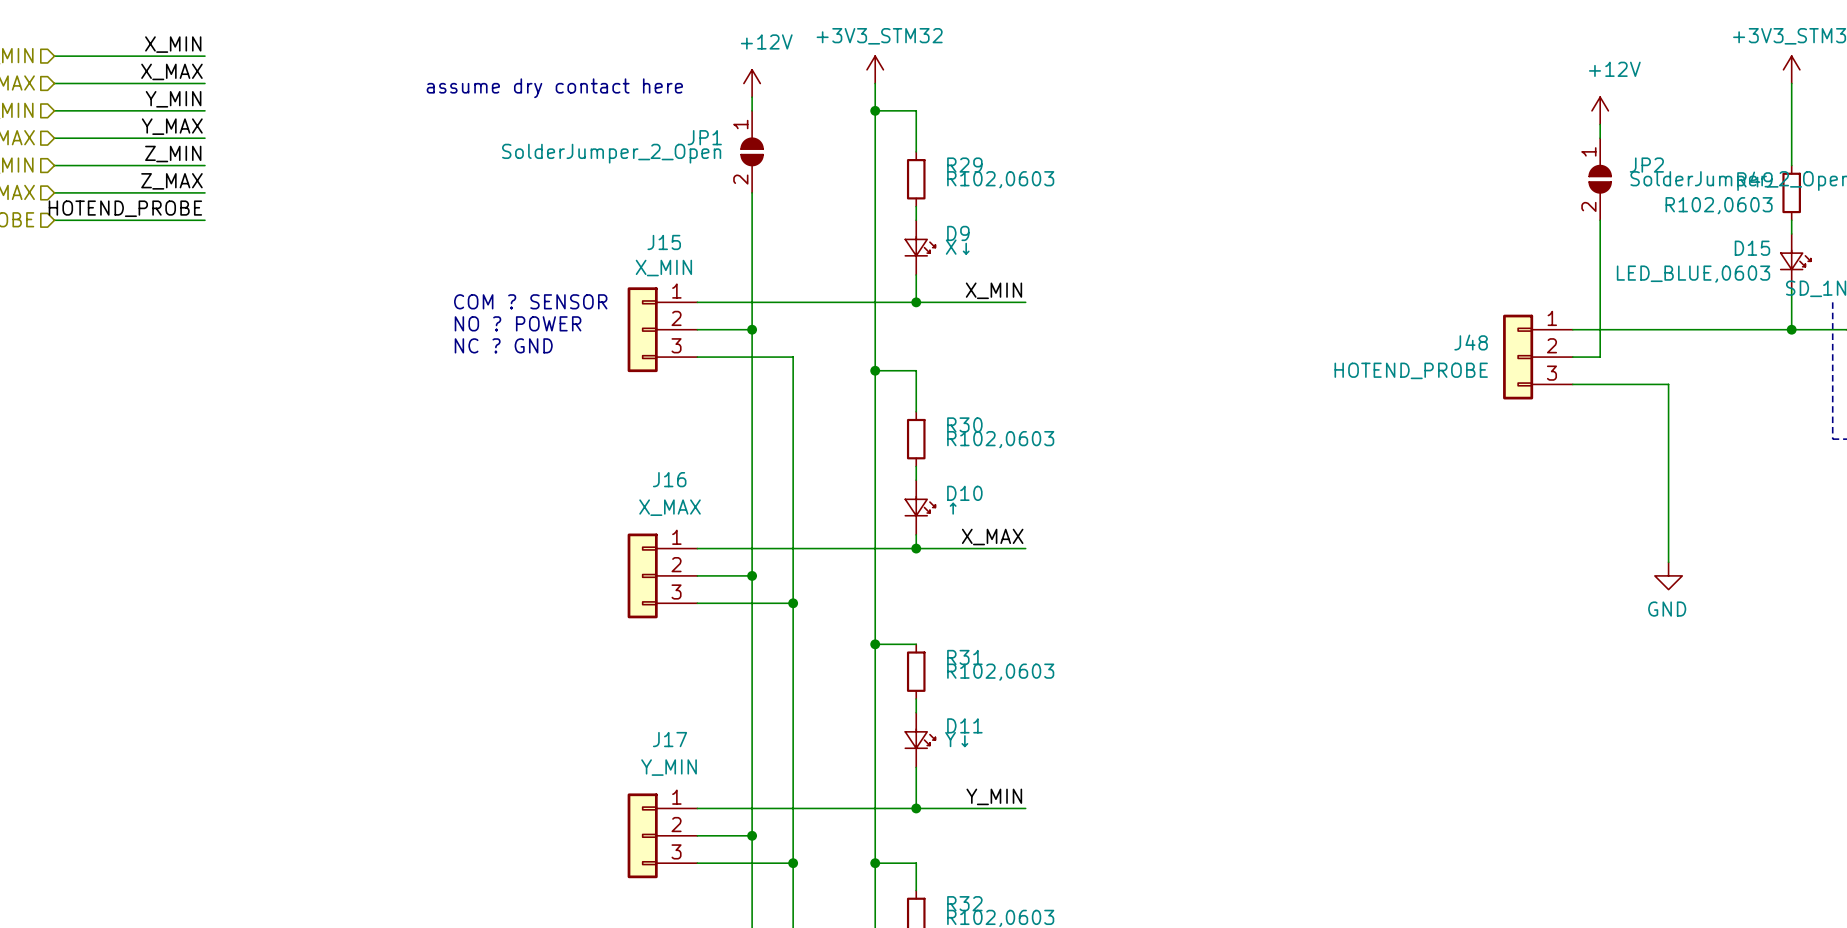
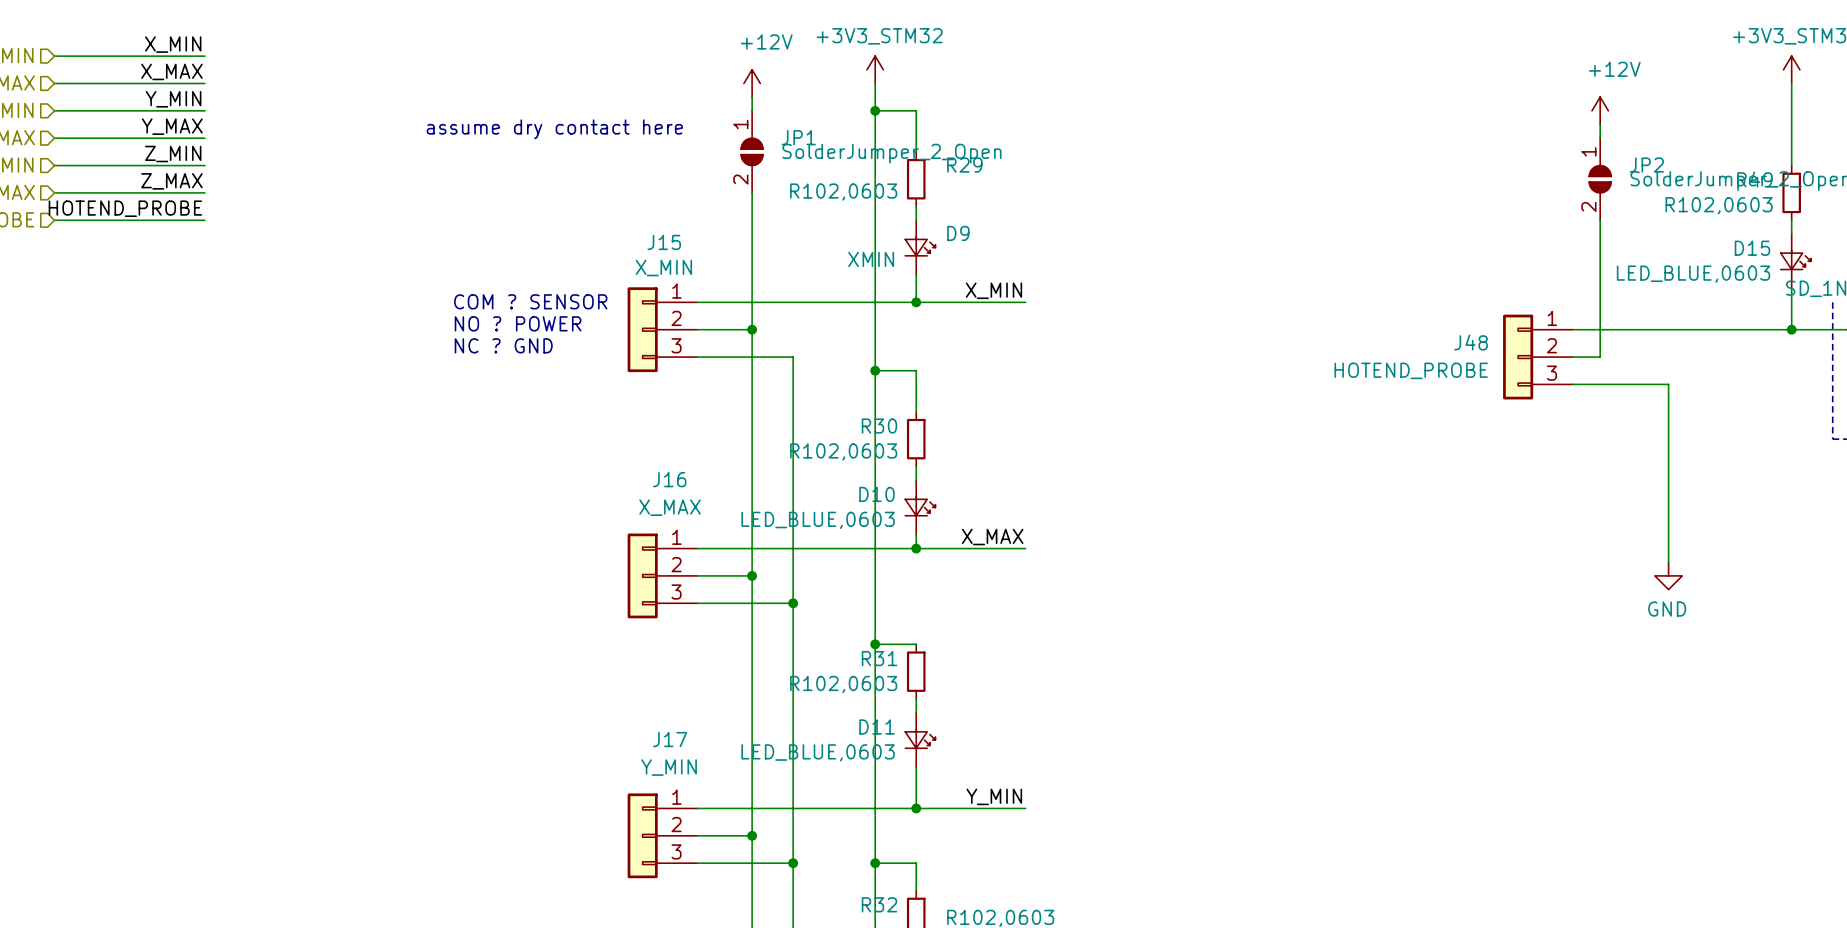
text position: assume dry contact here (554, 88) -> assume dry contact here (554, 129)
JP1 name position: JP1 (704, 137) -> JP1 (798, 137)
JP1 value position: SolderJumper_2_Open (611, 153) -> SolderJumper_2_Open (891, 153)
R29 value position: R102,0603 (1000, 179) -> R102,0603 (843, 192)
D9 value: X↓ (957, 247) -> XMIN (871, 259)
R30 name position: R30 (964, 424) -> R30 (879, 426)
R30 value position: R102,0603 (1000, 439) -> R102,0603 (843, 451)
D10 name position: D10 (964, 493) -> D10 (877, 494)
D10 value: ↑ (953, 508) -> LED_BLUE,0603 (818, 520)
R31 name position: R31 (964, 657) -> R31 (879, 658)
R31 value position: R102,0603 (1000, 672) -> R102,0603 (843, 684)
D11 name position: D11 (964, 725) -> D11 (877, 726)
D11 value: Y↓ (956, 739) -> LED_BLUE,0603 (818, 752)
R32 name position: R32 (964, 903) -> R32 (879, 904)

